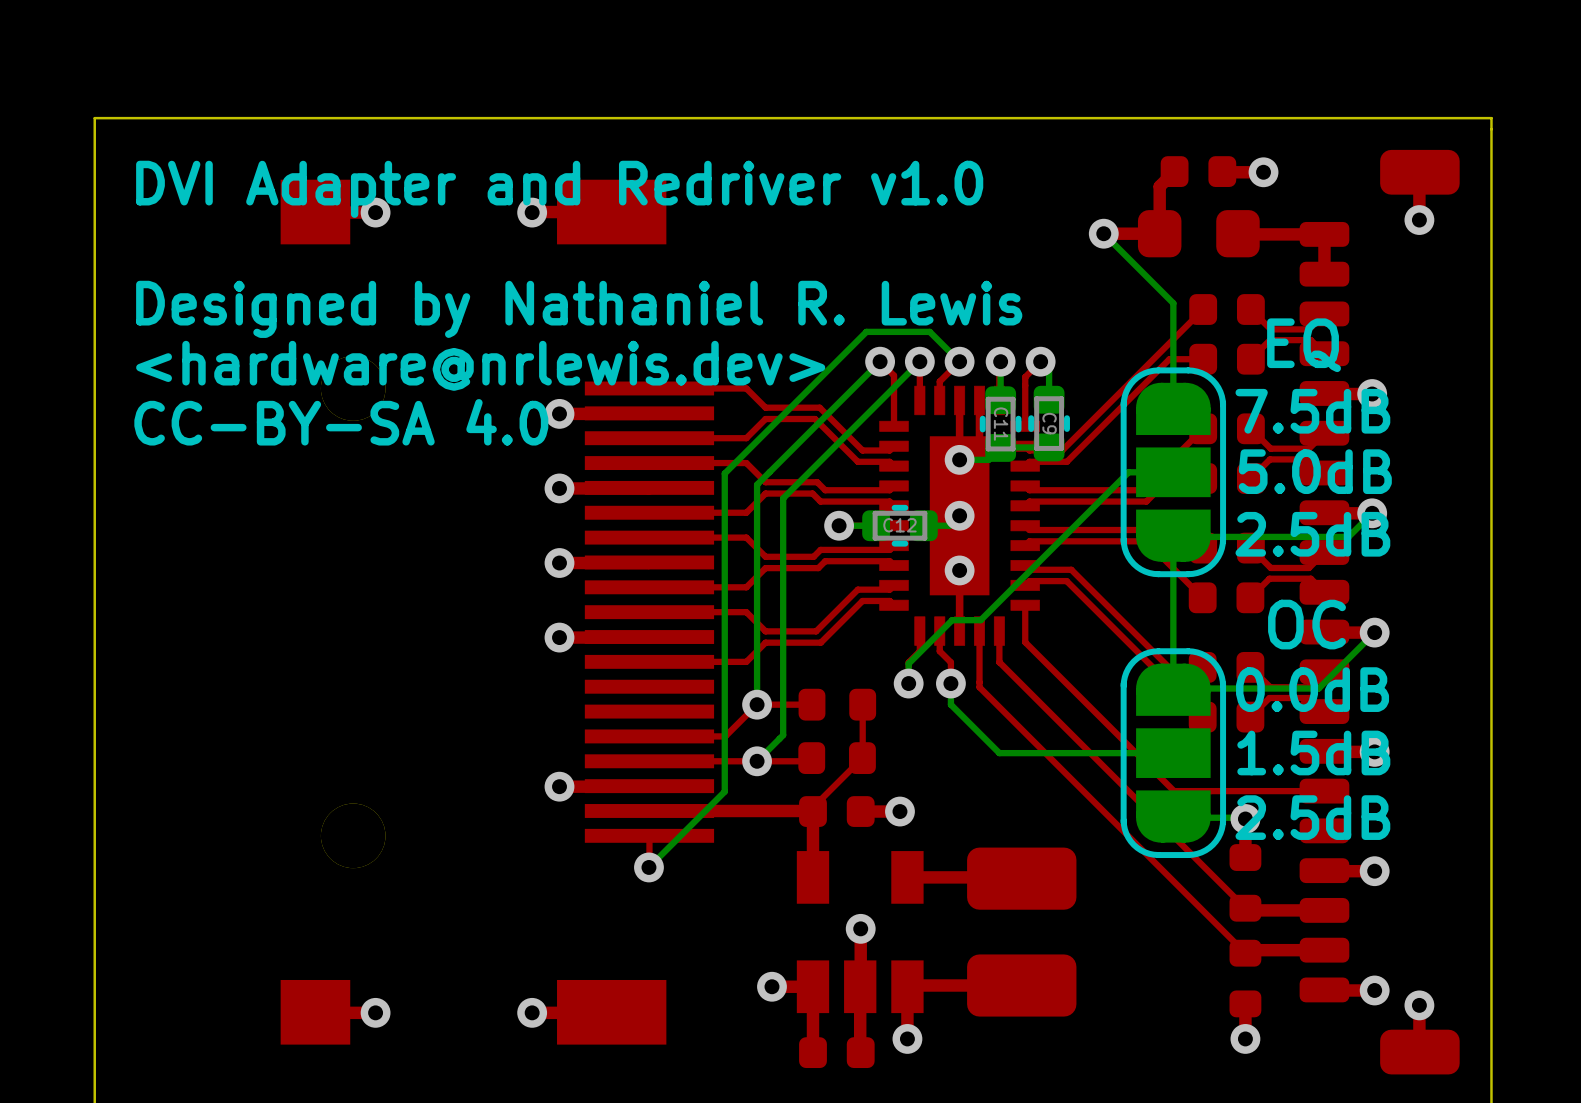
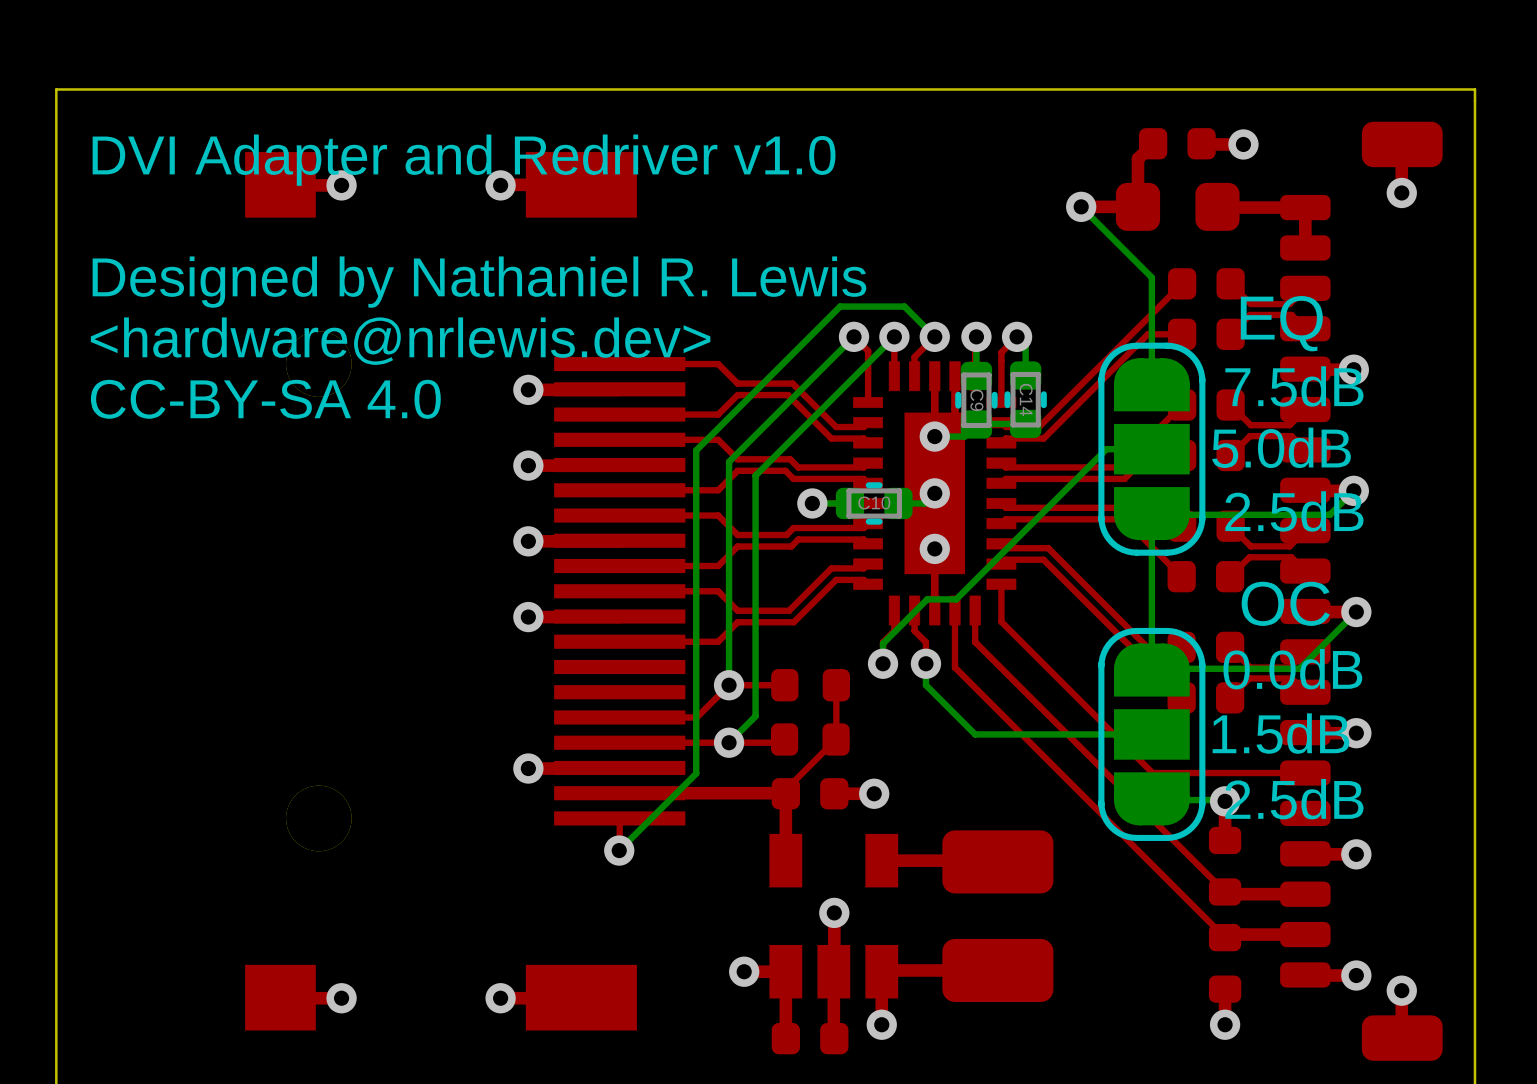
C9 name: C9 (1049, 423) -> C14 (1026, 399)
C11 name: C11 (1001, 424) -> C9 (976, 400)
C12 name: C12 (899, 525) -> C10 (874, 502)

